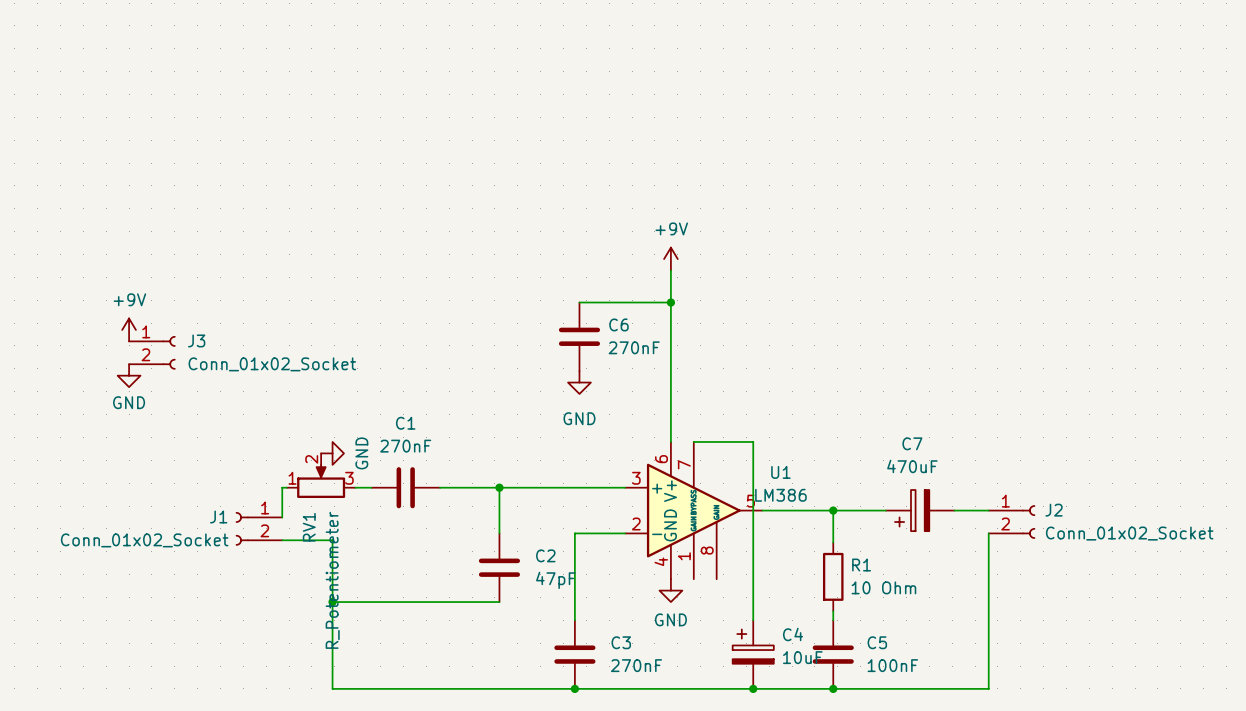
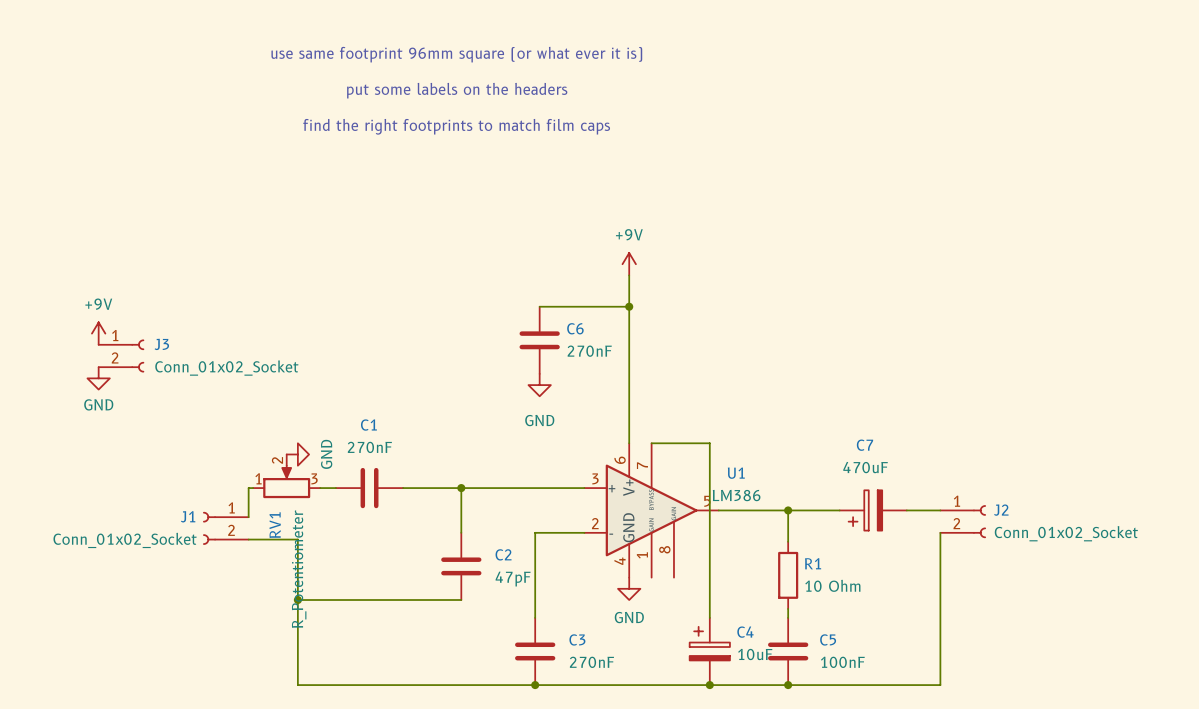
text: none -> use same footprint 96mm square (or what ever it is) (456, 54)
text: none -> put some labels on the headers (457, 90)
text: none -> find the right footprints to match film caps (456, 126)

